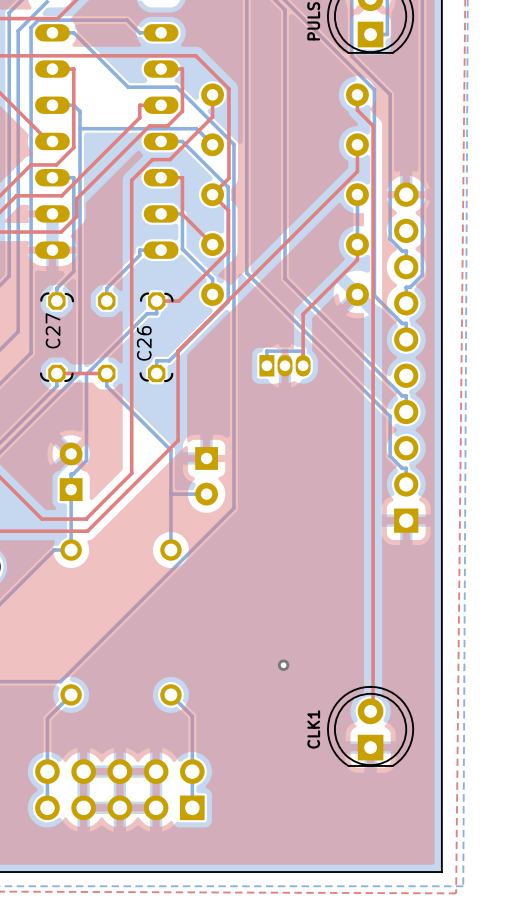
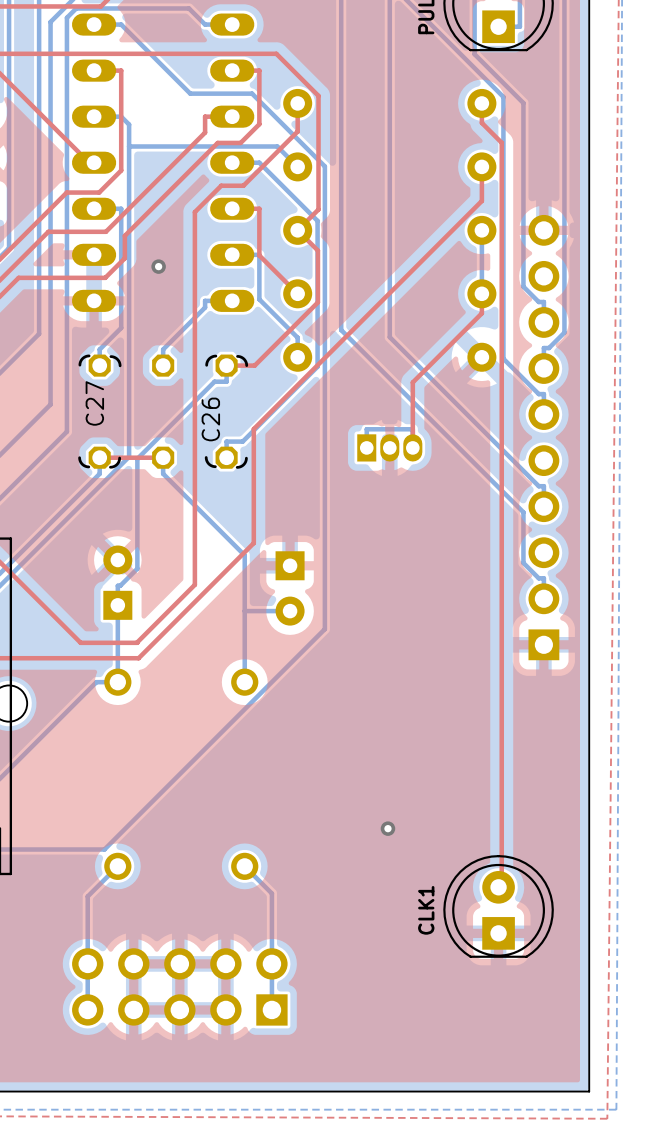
via: none -> (158, 266)

